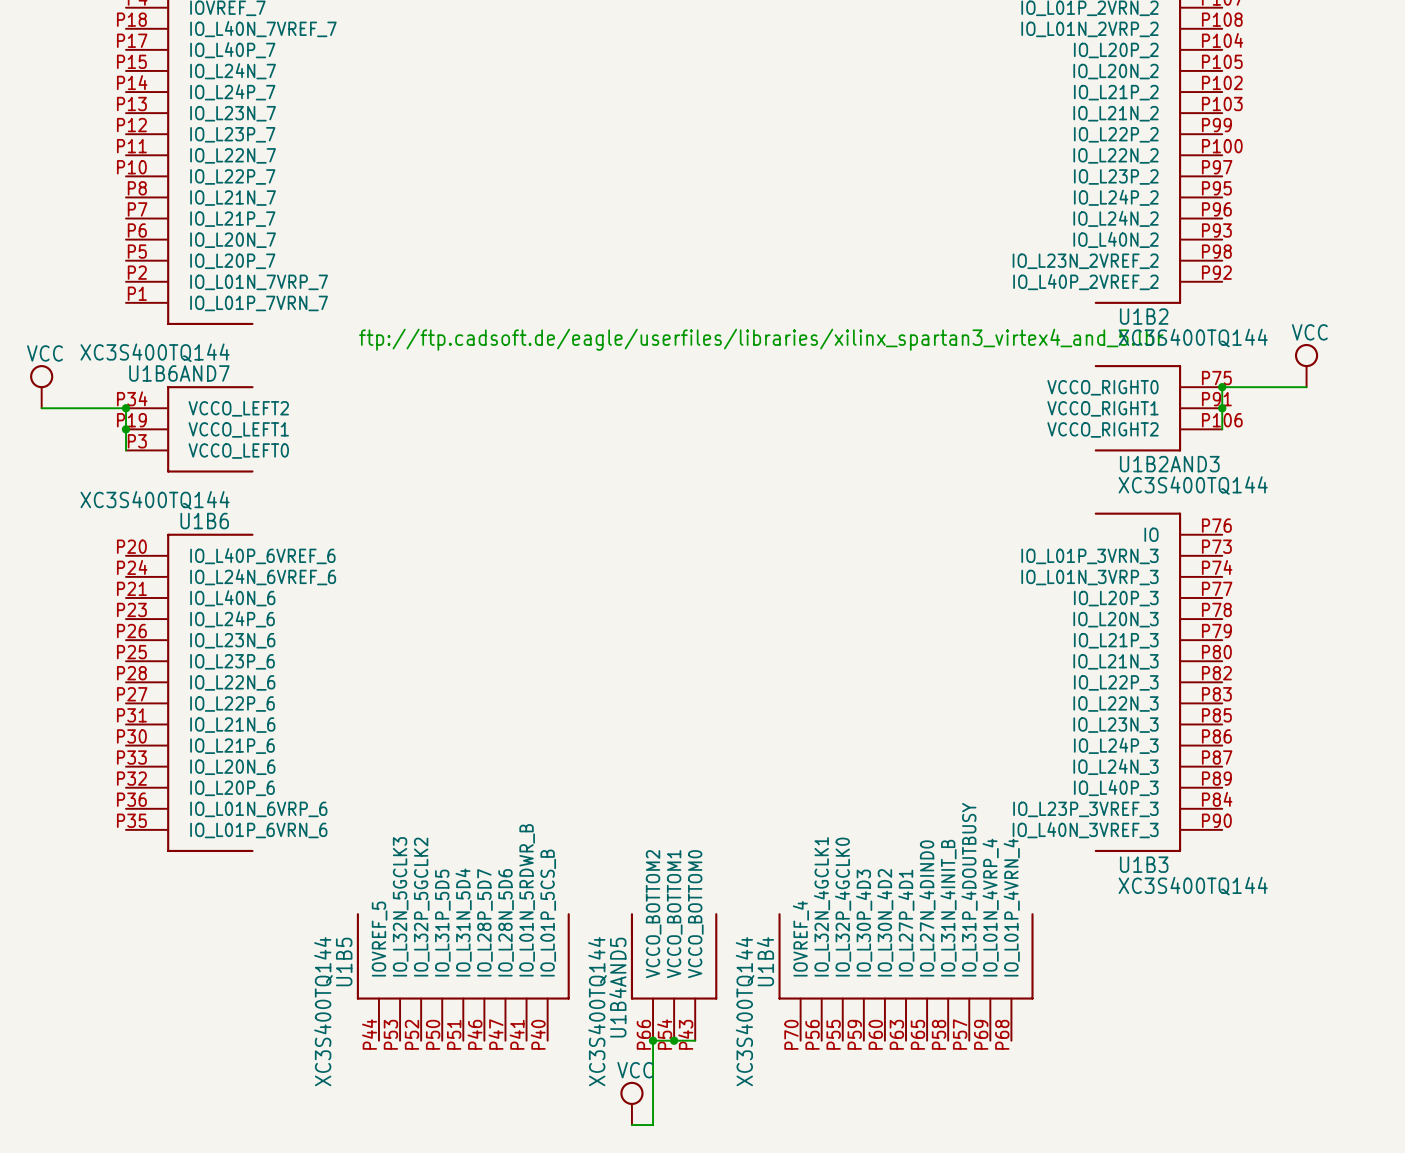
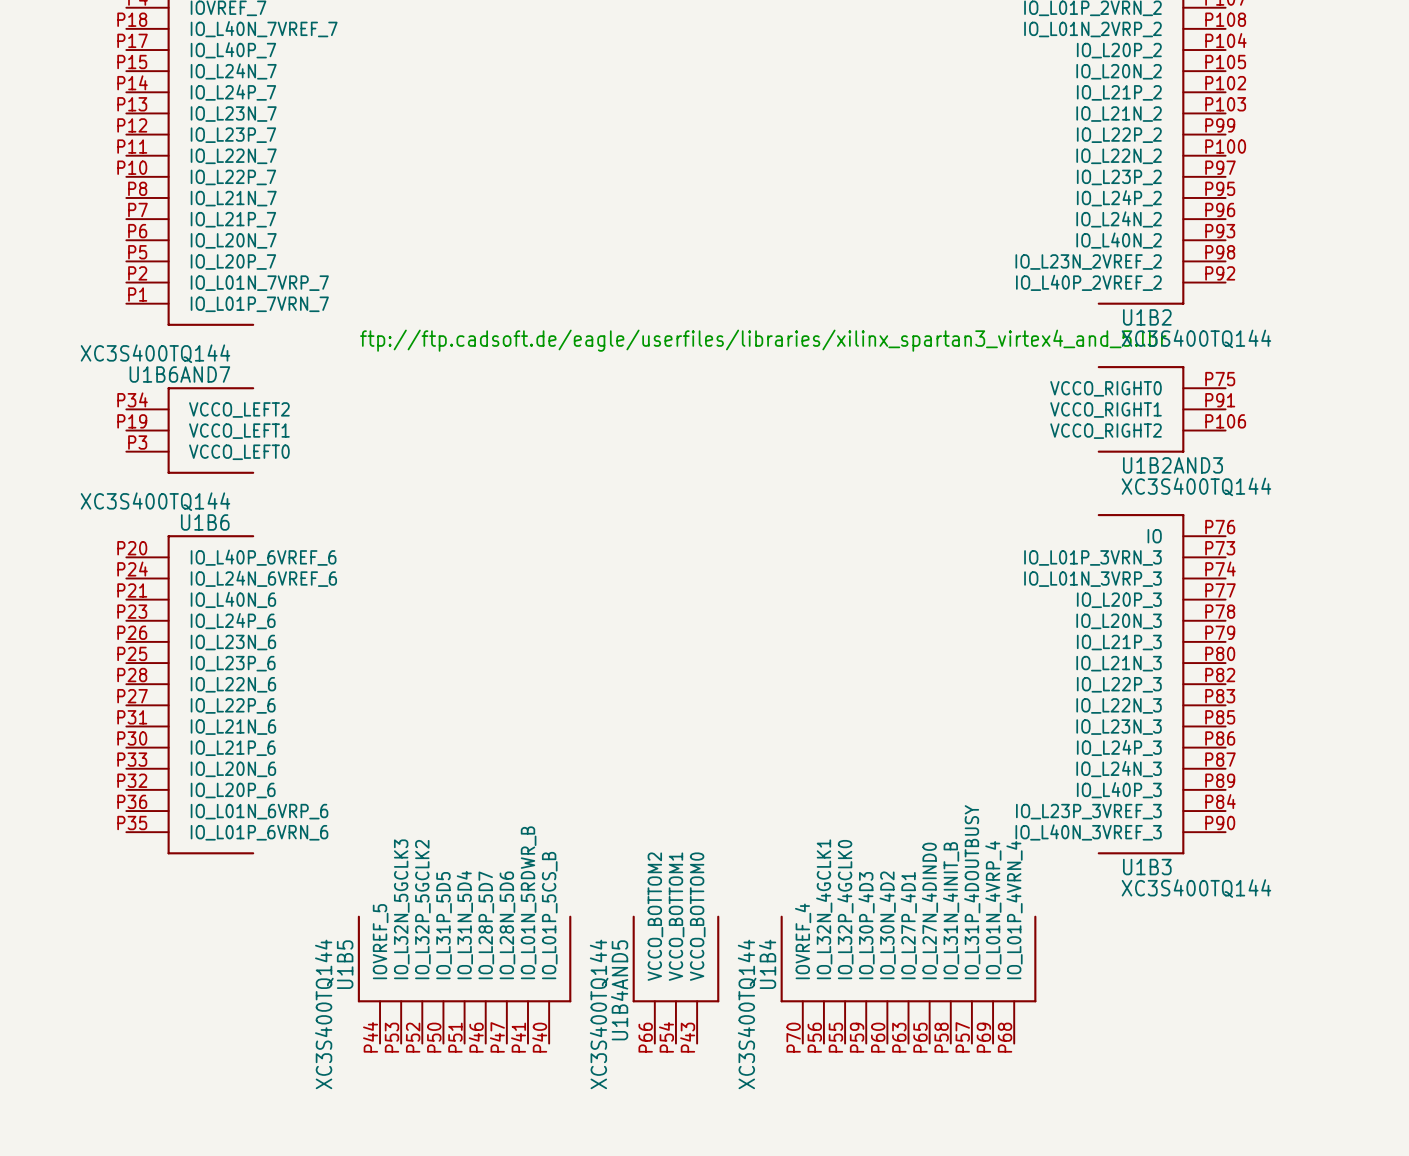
power symbol: VCC (1306, 365) -> none
power symbol: VCC (41, 386) -> none
junction: (1222, 387) -> none
wire: (1306, 387) (1222, 387) (1222, 429) -> none
wire: (41, 408) (126, 408) (126, 450) -> none
junction: (126, 408) -> none
junction: (1222, 408) -> none
junction: (126, 429) -> none
junction: (653, 1040) -> none
junction: (674, 1040) -> none
wire: (695, 1040) (653, 1040) (653, 1125) (631, 1125) -> none
power symbol: VCC (631, 1103) -> none

